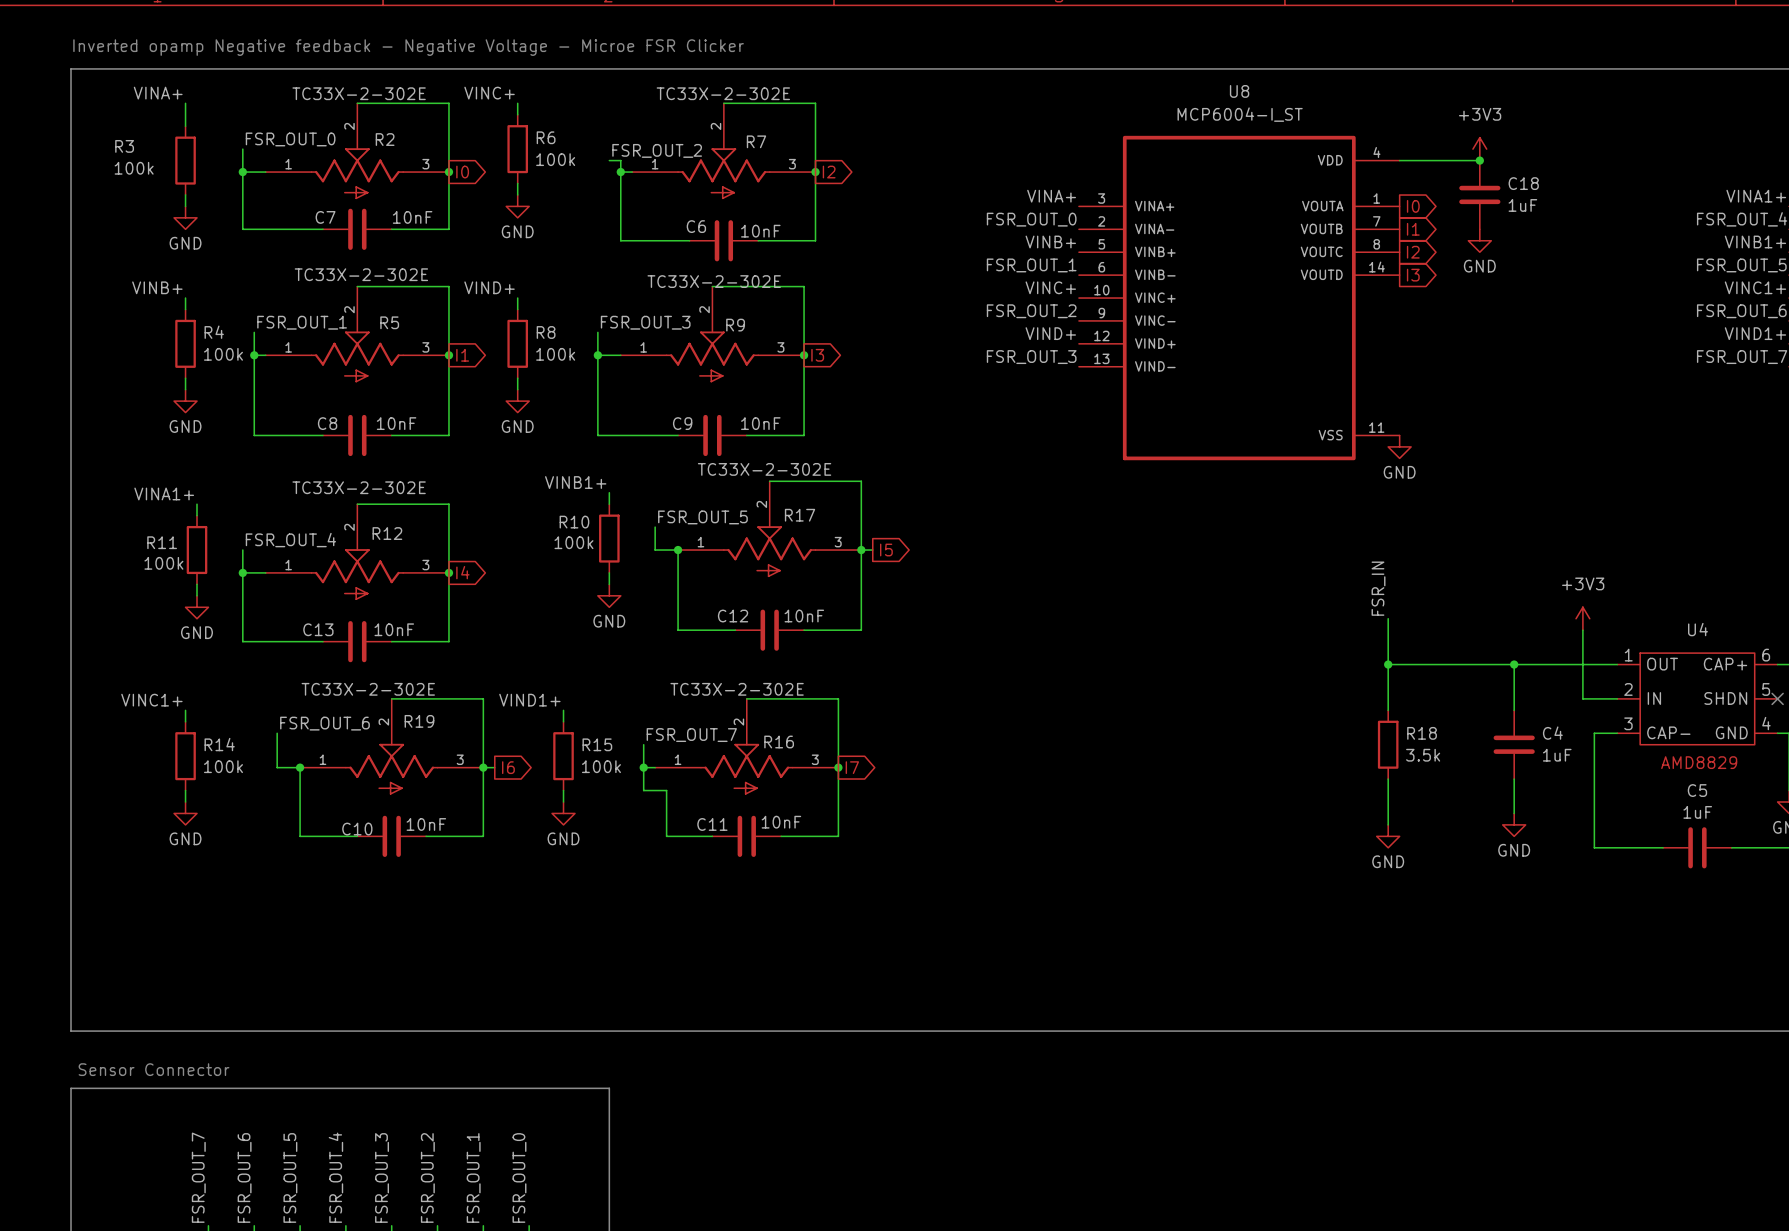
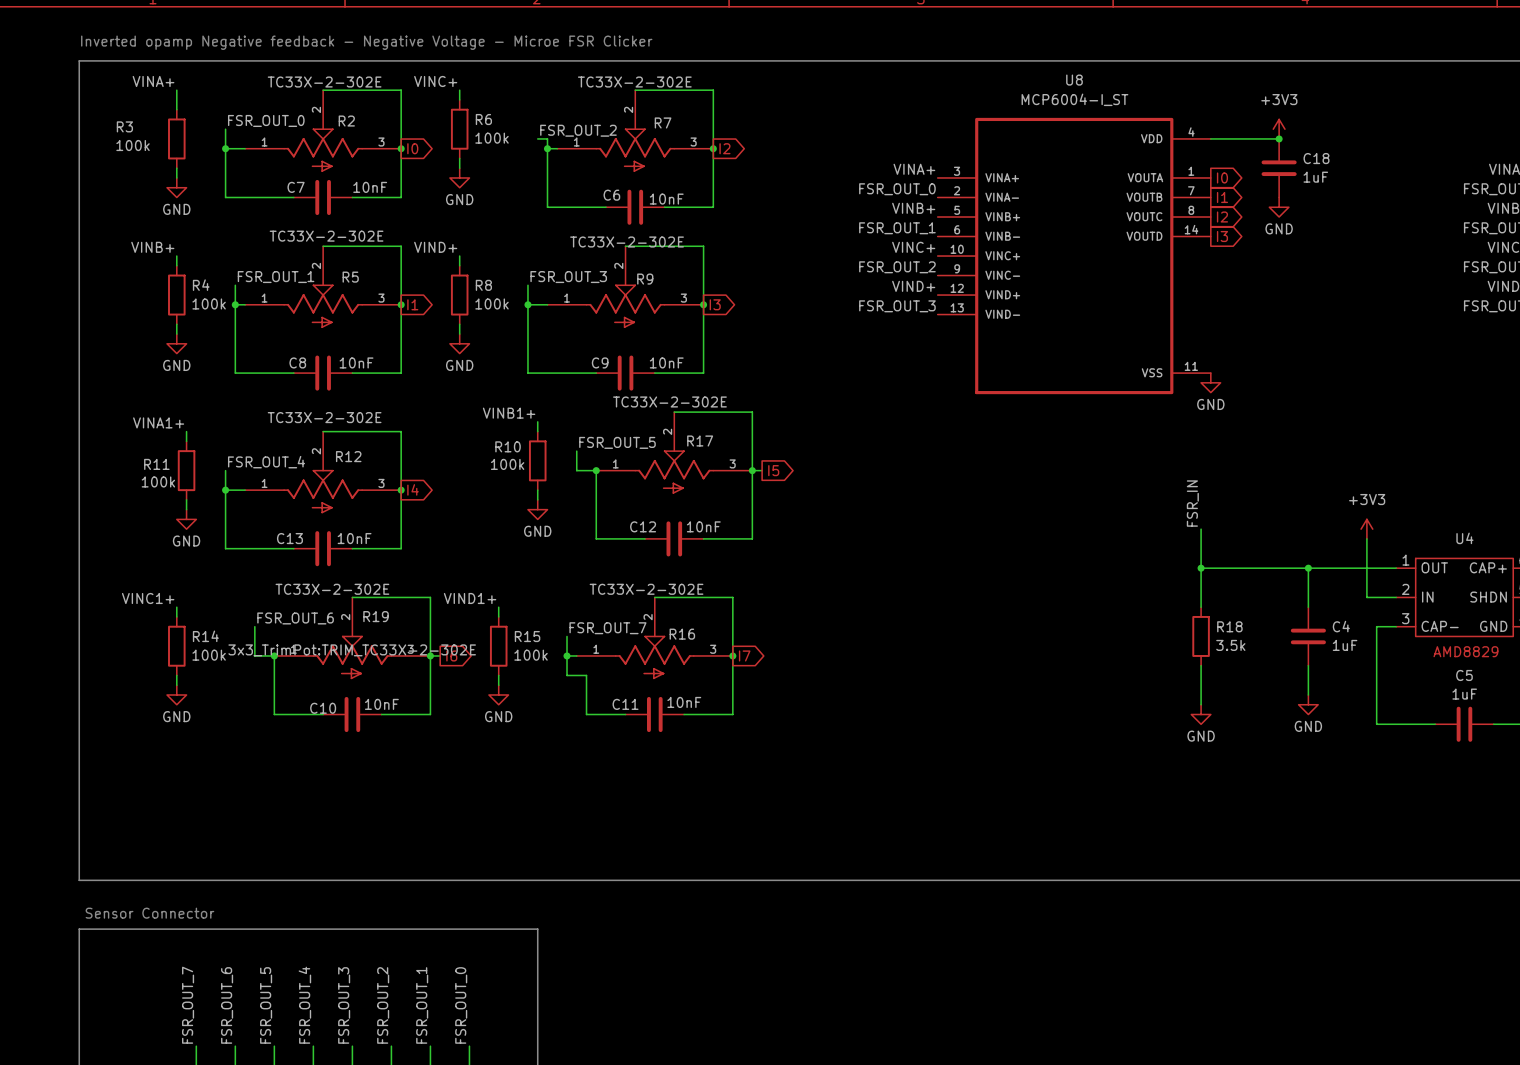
R19 text: none -> 3x3_TrimPot:TRIM_TC33X-2-302E (352, 650)

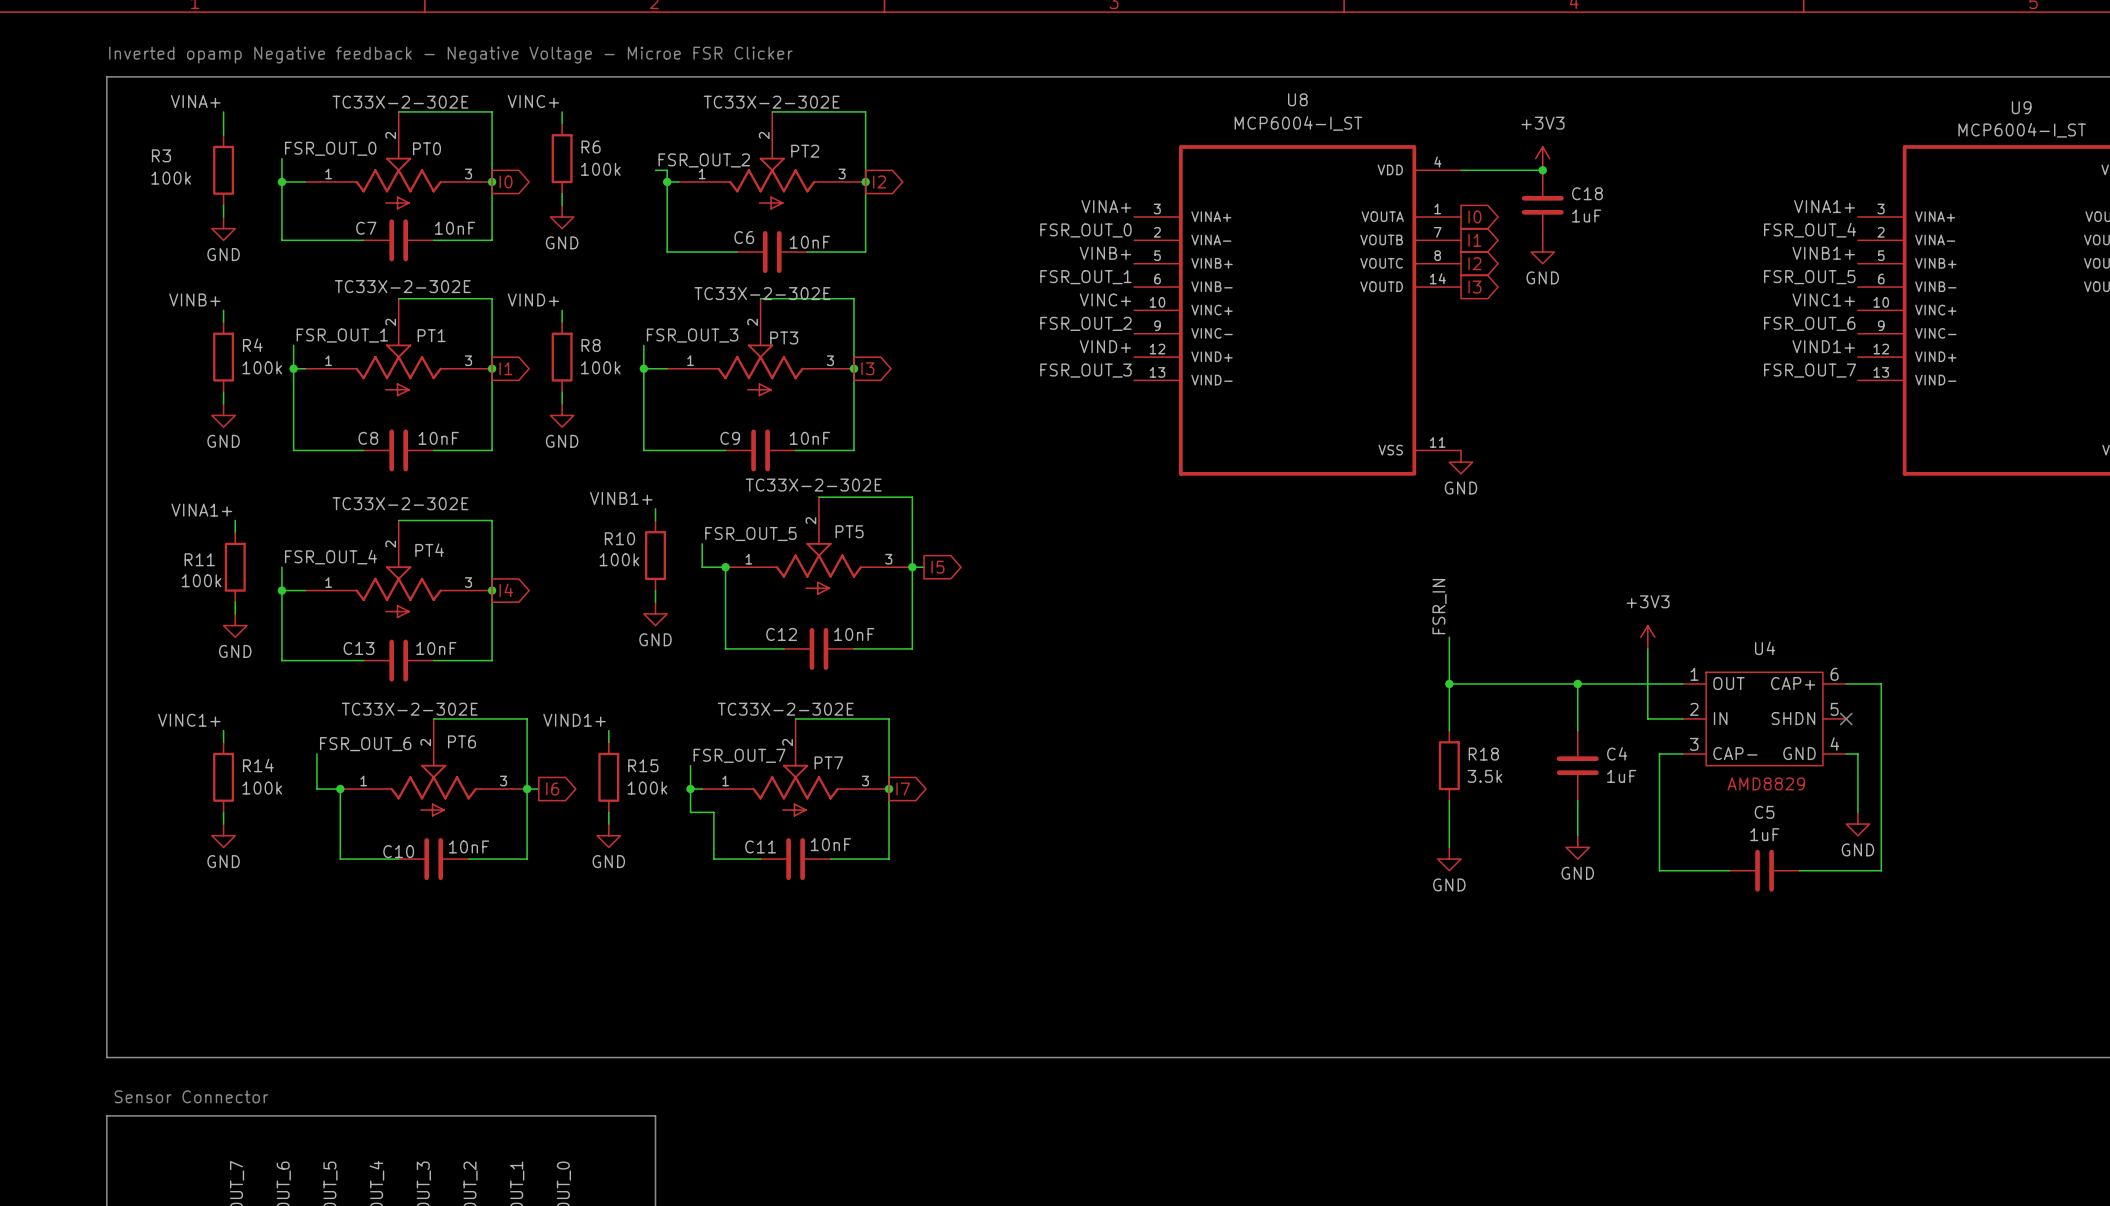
R2 name: R2 (346, 121) -> PT0 (426, 148)
R7 name: R7 (663, 122) -> PT2 (805, 151)
R5 name: R5 (350, 277) -> PT1 (431, 335)
R9 name: R9 (645, 279) -> PT3 (784, 337)
R17 name: R17 (700, 441) -> PT5 (849, 531)
R12 name: R12 (348, 456) -> PT4 (429, 550)
R19 name: R19 (376, 616) -> PT6 (462, 741)
R16 name: R16 (682, 634) -> PT7 (828, 762)
R19 text: 3x3_TrimPot:TRIM_TC33X-2-302E (352, 650) -> none

